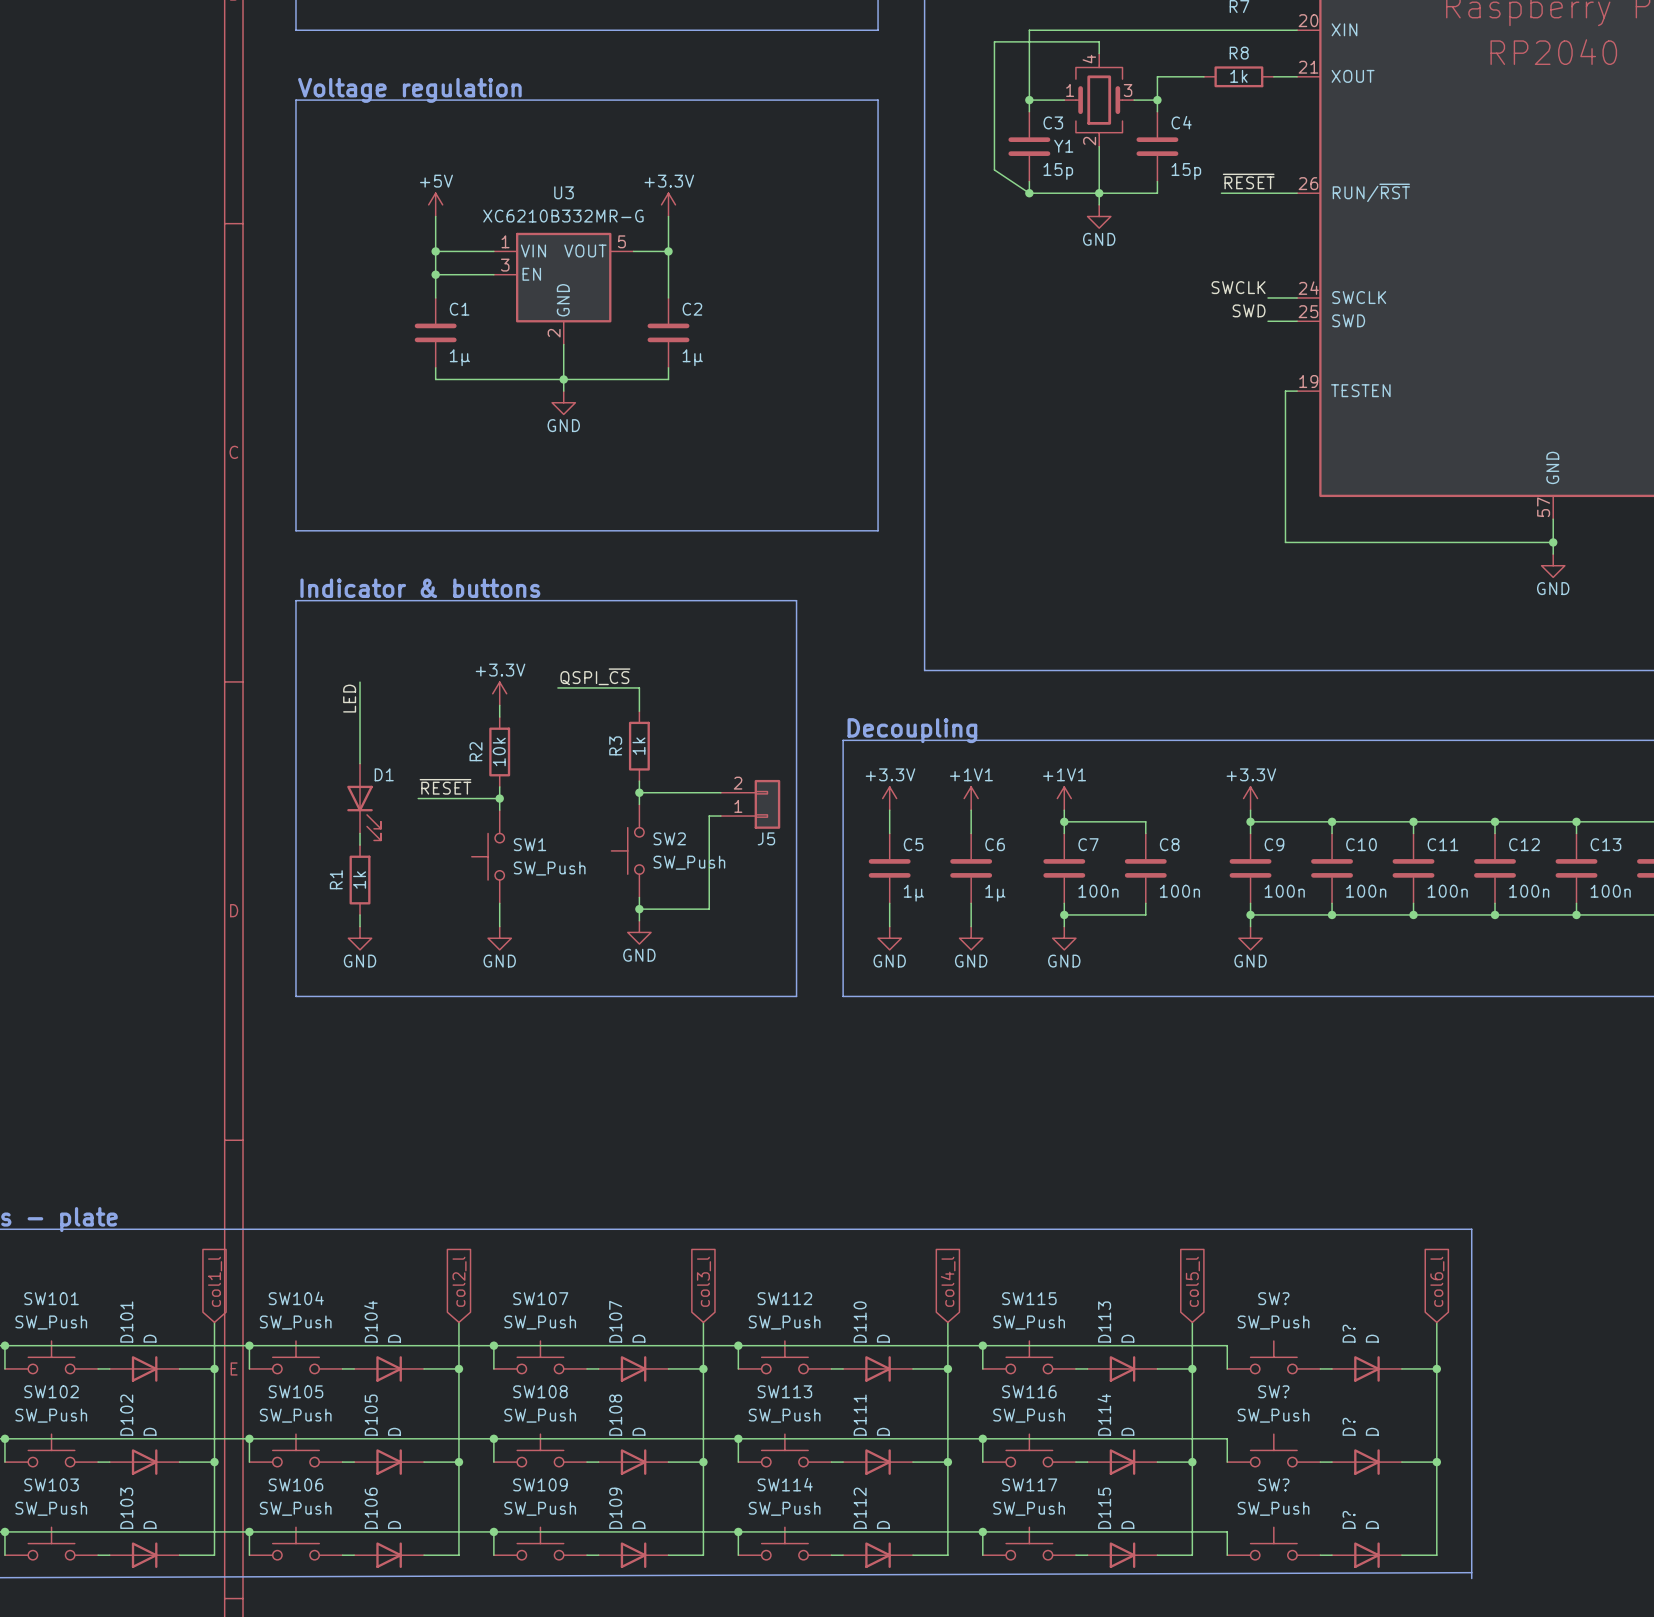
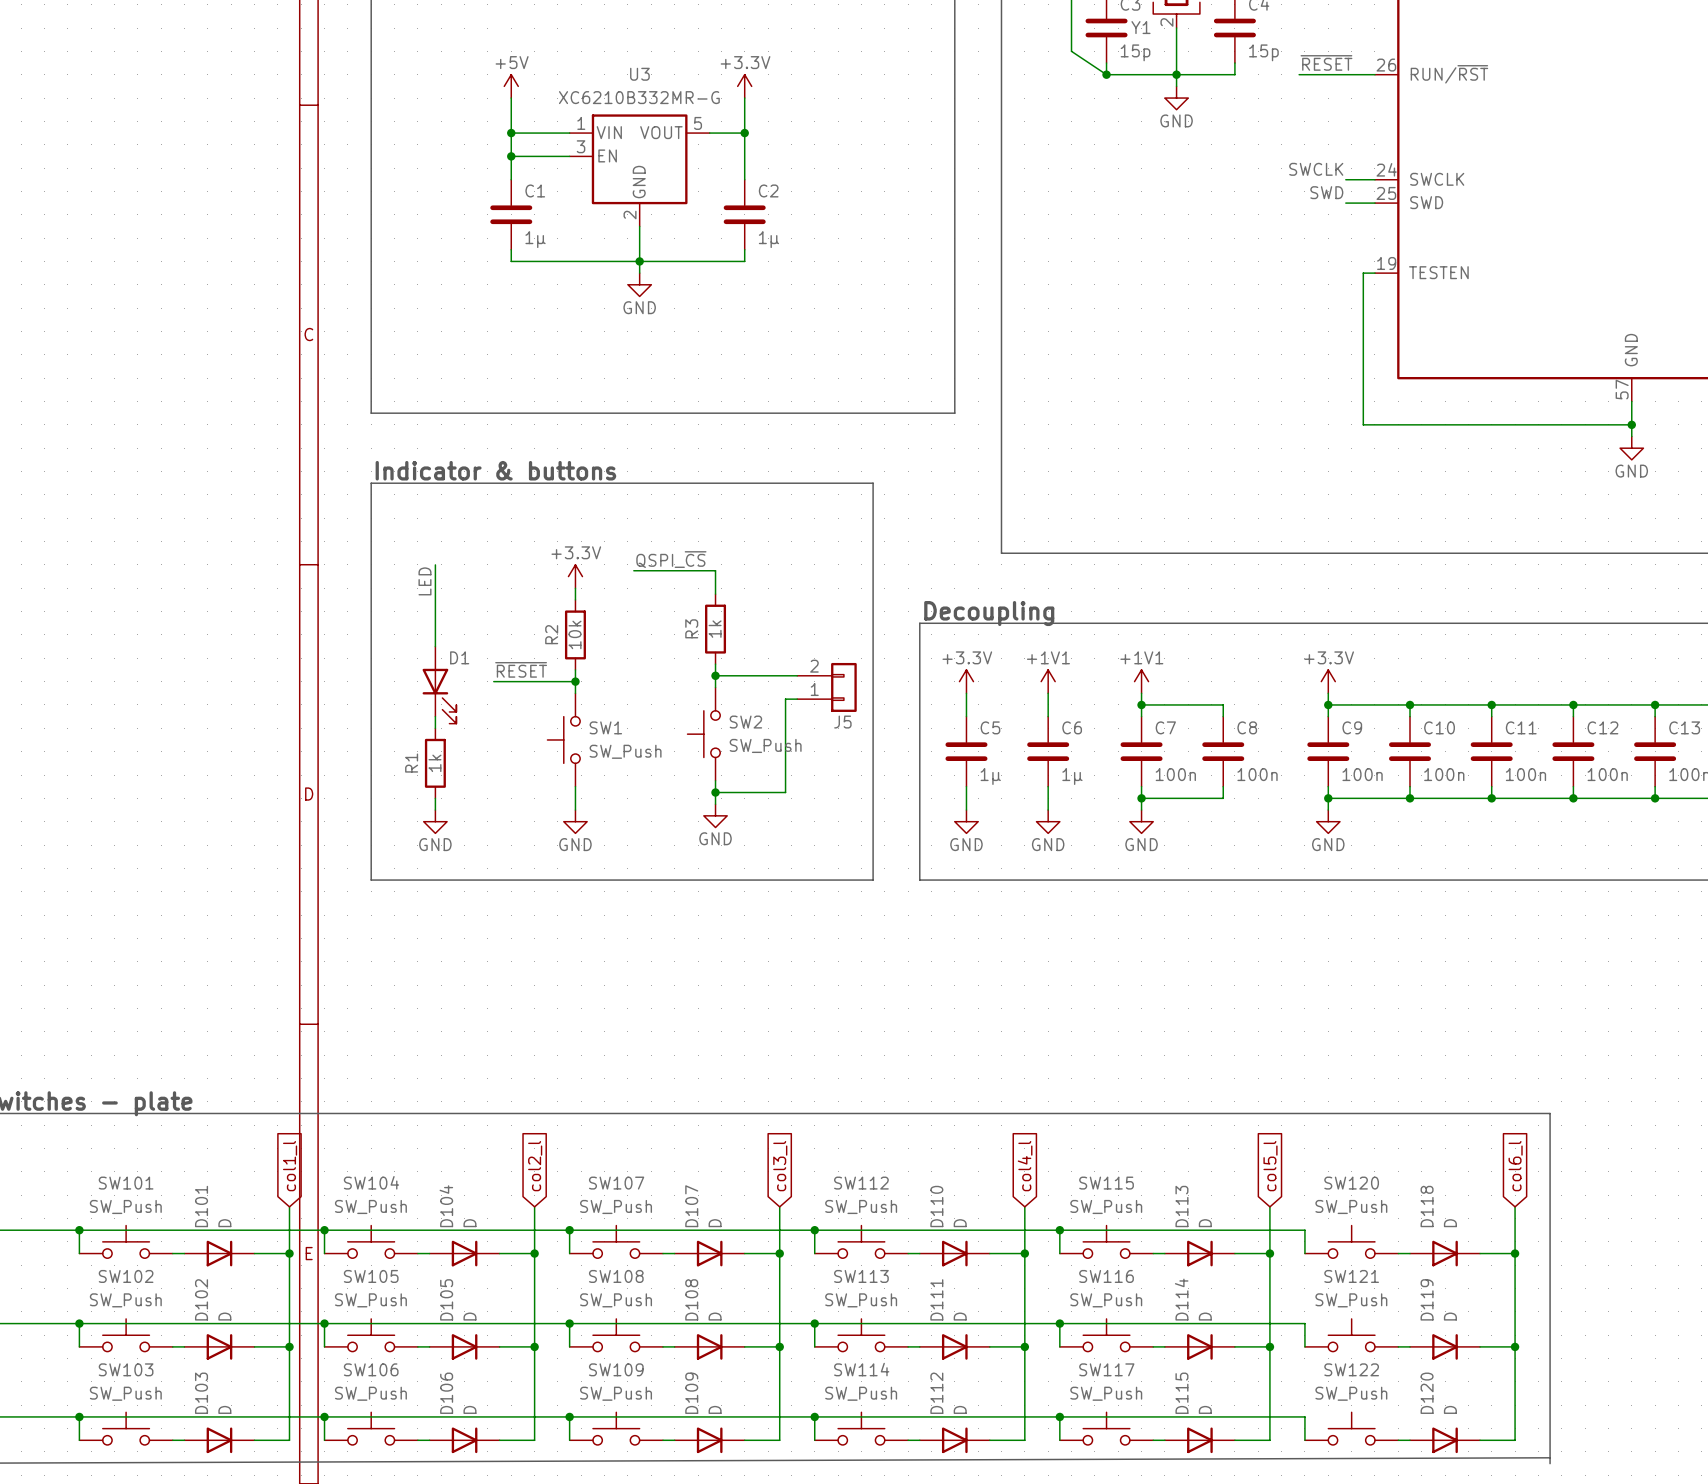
SW? name: SW? (1273, 1298) -> SW120 (1351, 1183)
D? name: D? (1349, 1333) -> D118 (1427, 1206)
SW? name: SW? (1273, 1391) -> SW121 (1351, 1276)
D? name: D? (1349, 1426) -> D119 (1427, 1299)
SW? name: SW? (1273, 1484) -> SW122 (1351, 1369)
D? name: D? (1349, 1519) -> D120 (1427, 1393)

